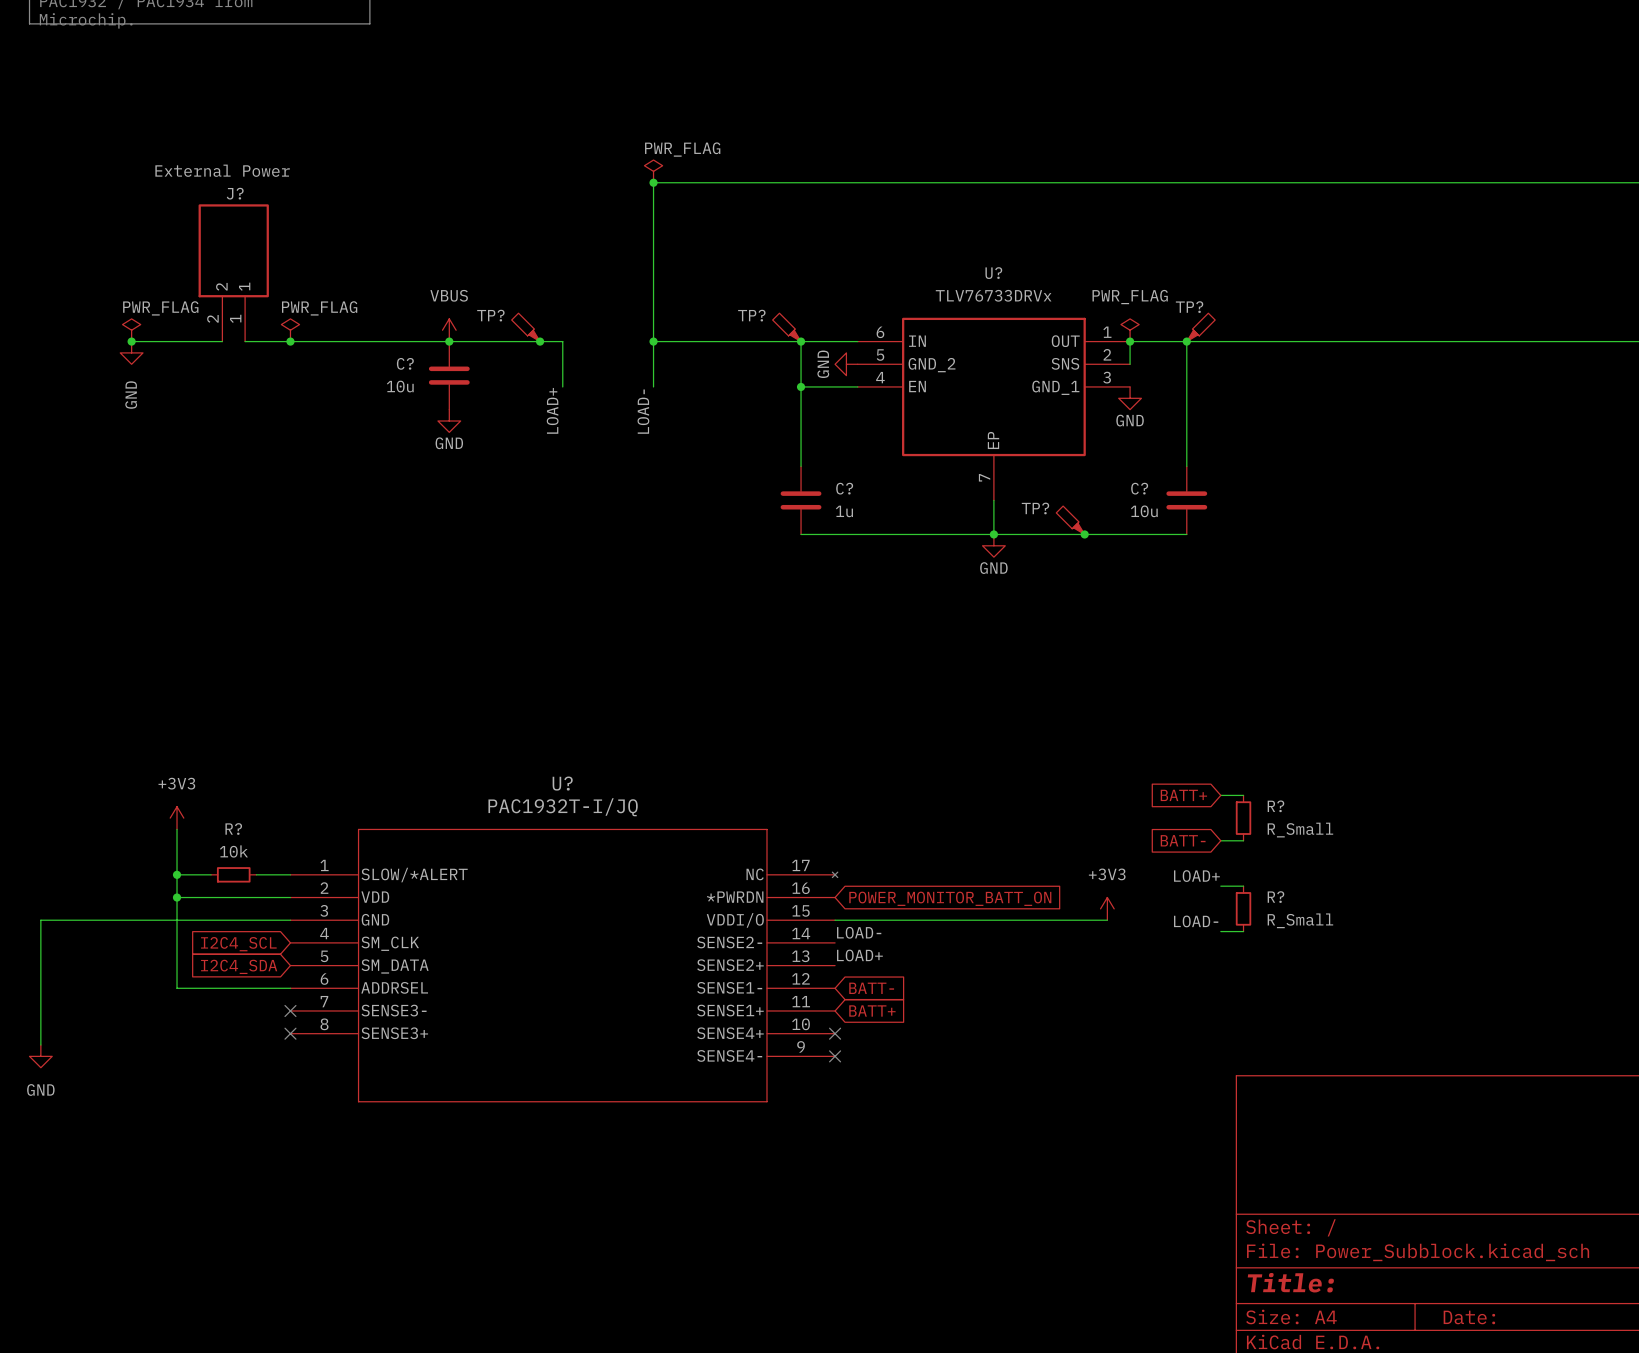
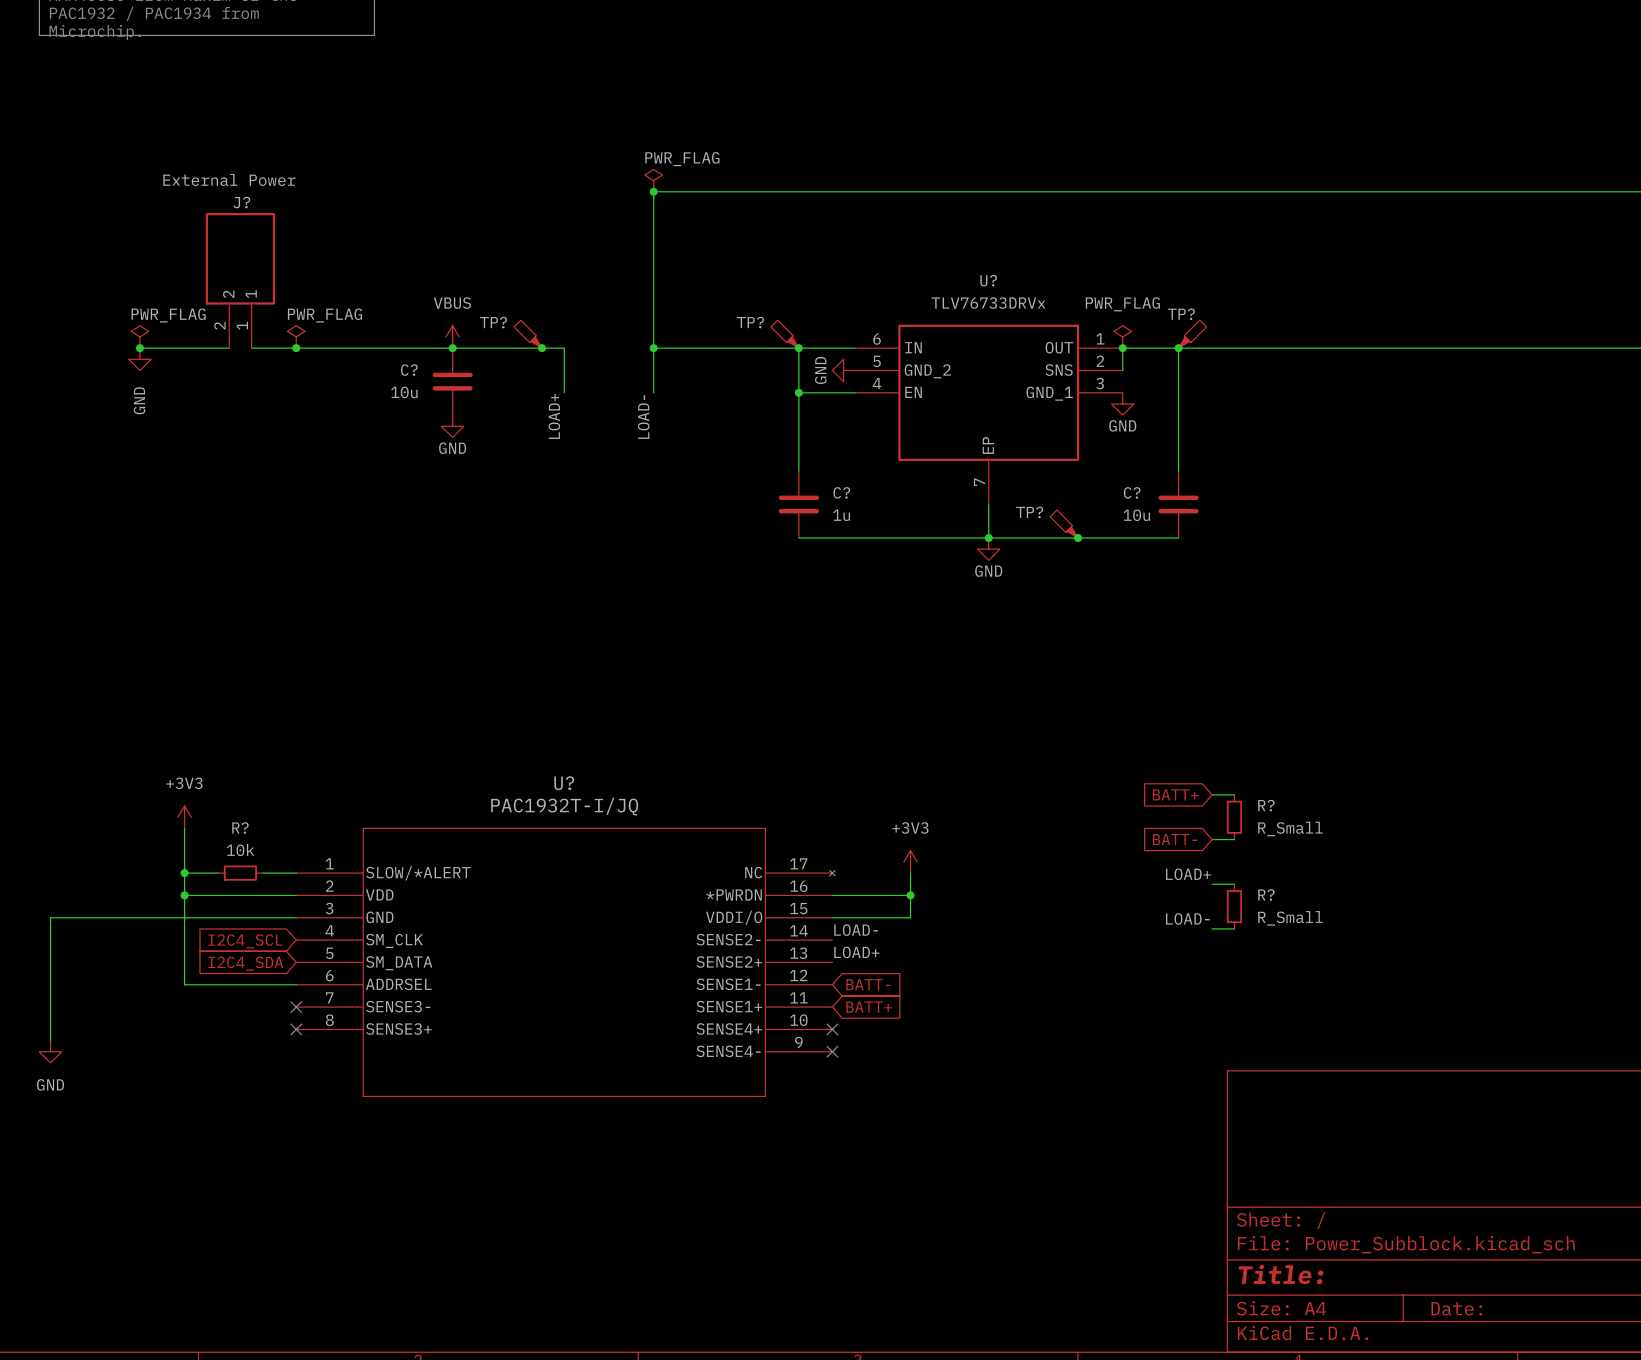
wire: none -> (832, 895) (910, 895)
junction: none -> (910, 895)
global label: POWER_MONITOR_BATT_ON (950, 898) -> none
power symbol position: +3V3 (1107, 908) -> +3V3 (910, 861)
wire: (914, 920) (1107, 920) -> (910, 917) (910, 873)

